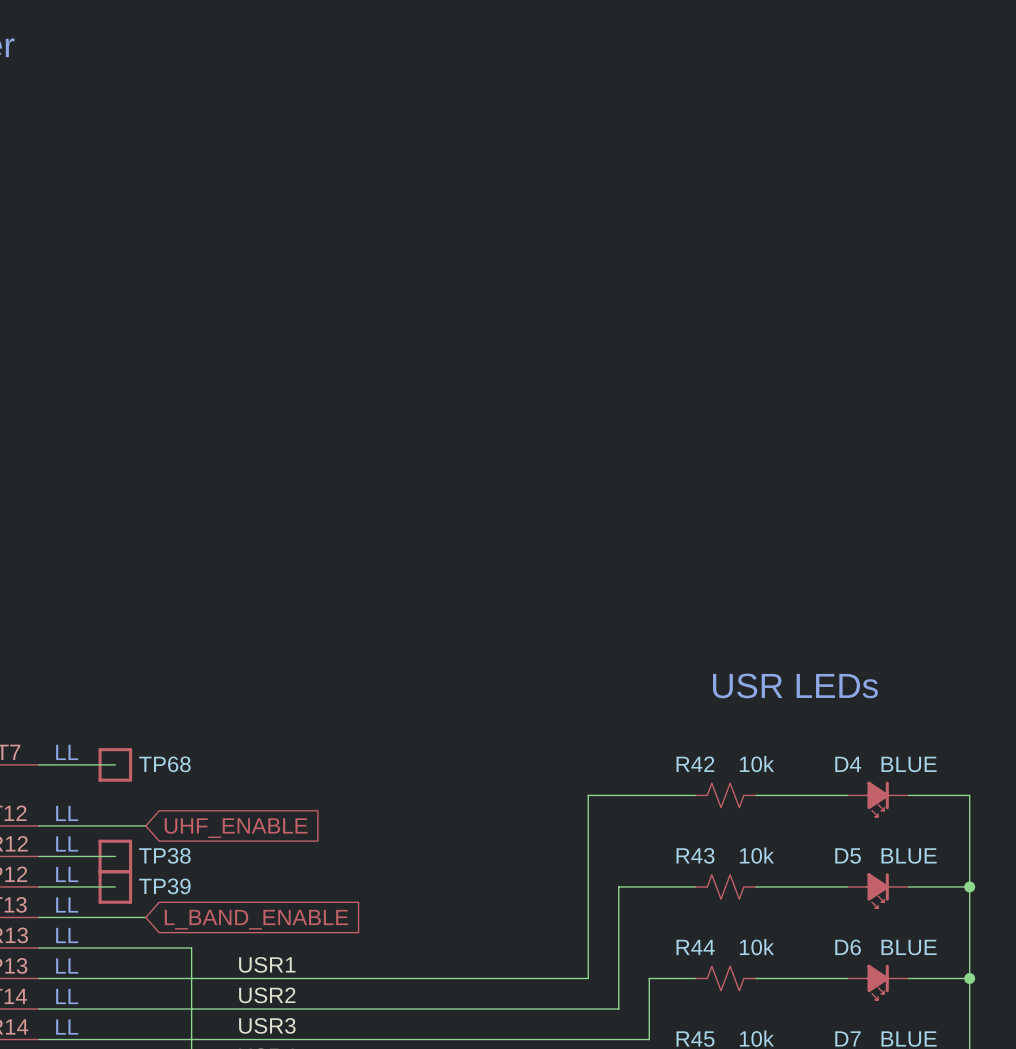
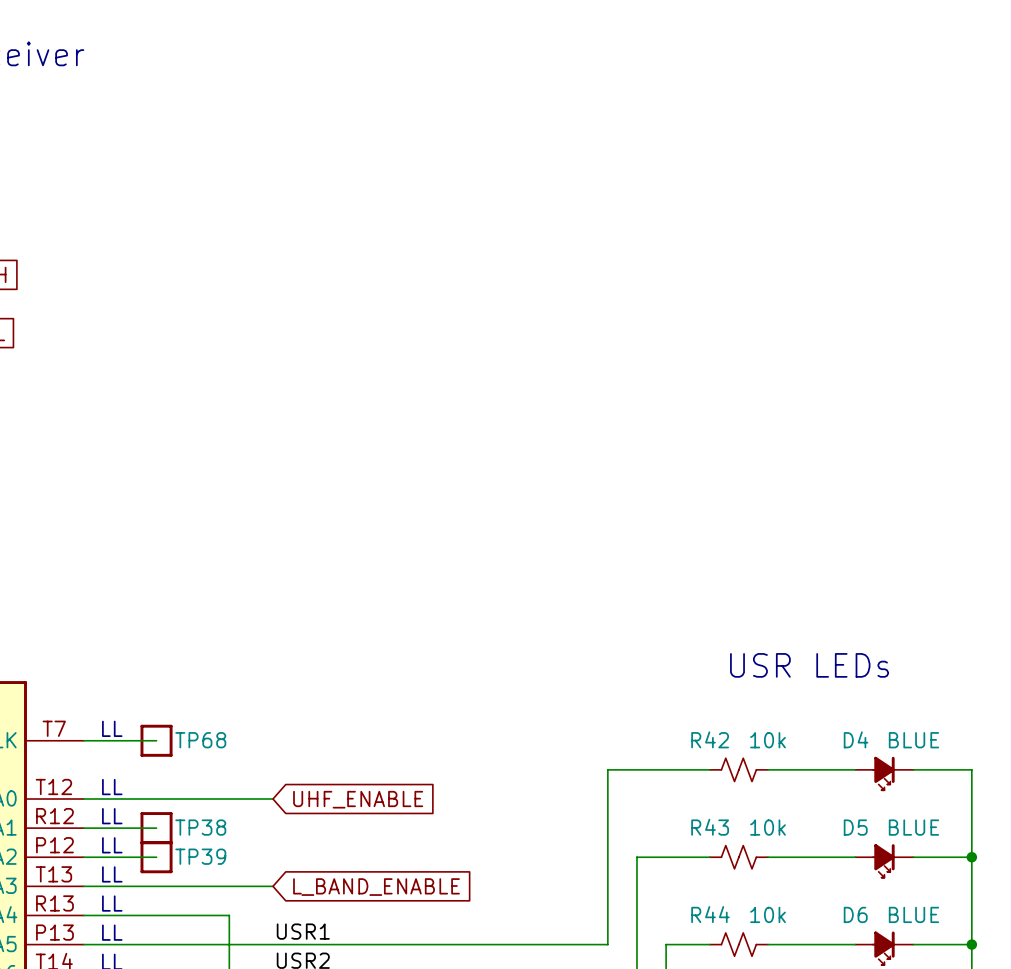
wire: none -> (185, 799) (273, 799)
global label position: UHF_ENABLE (236, 828) -> UHF_ENABLE (358, 799)
wire: none -> (185, 886) (273, 886)
global label position: L_BAND_ENABLE (256, 919) -> L_BAND_ENABLE (376, 887)

